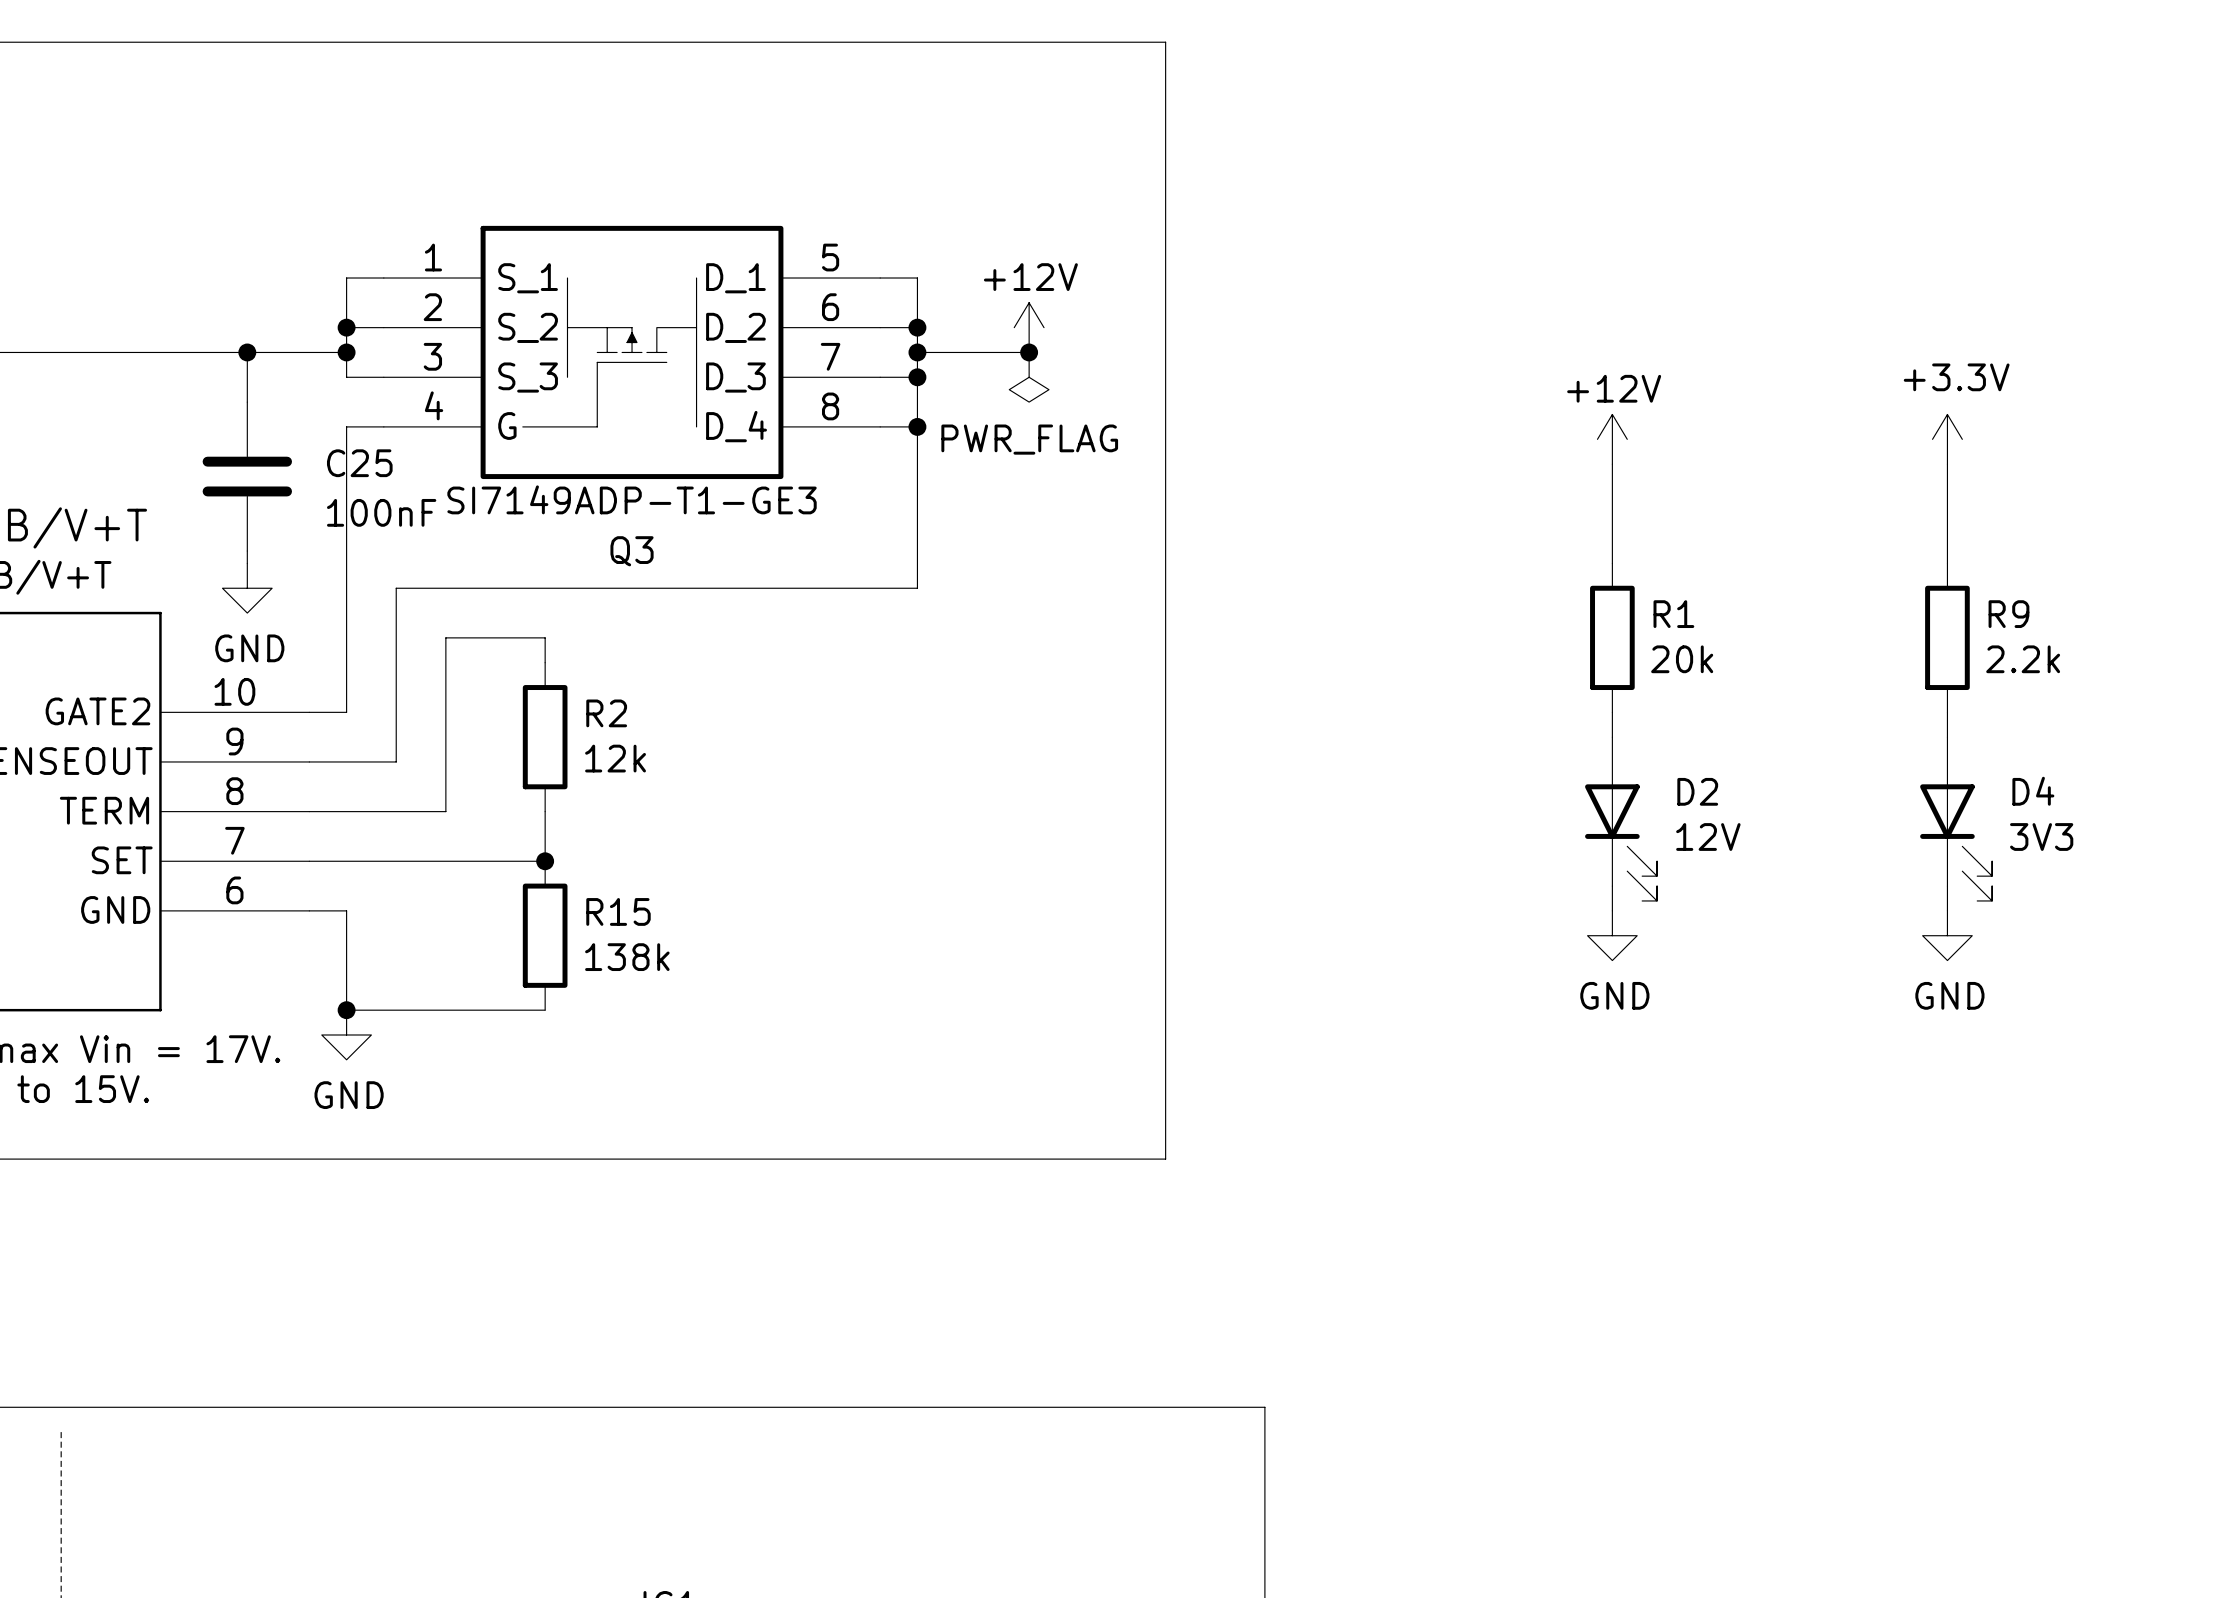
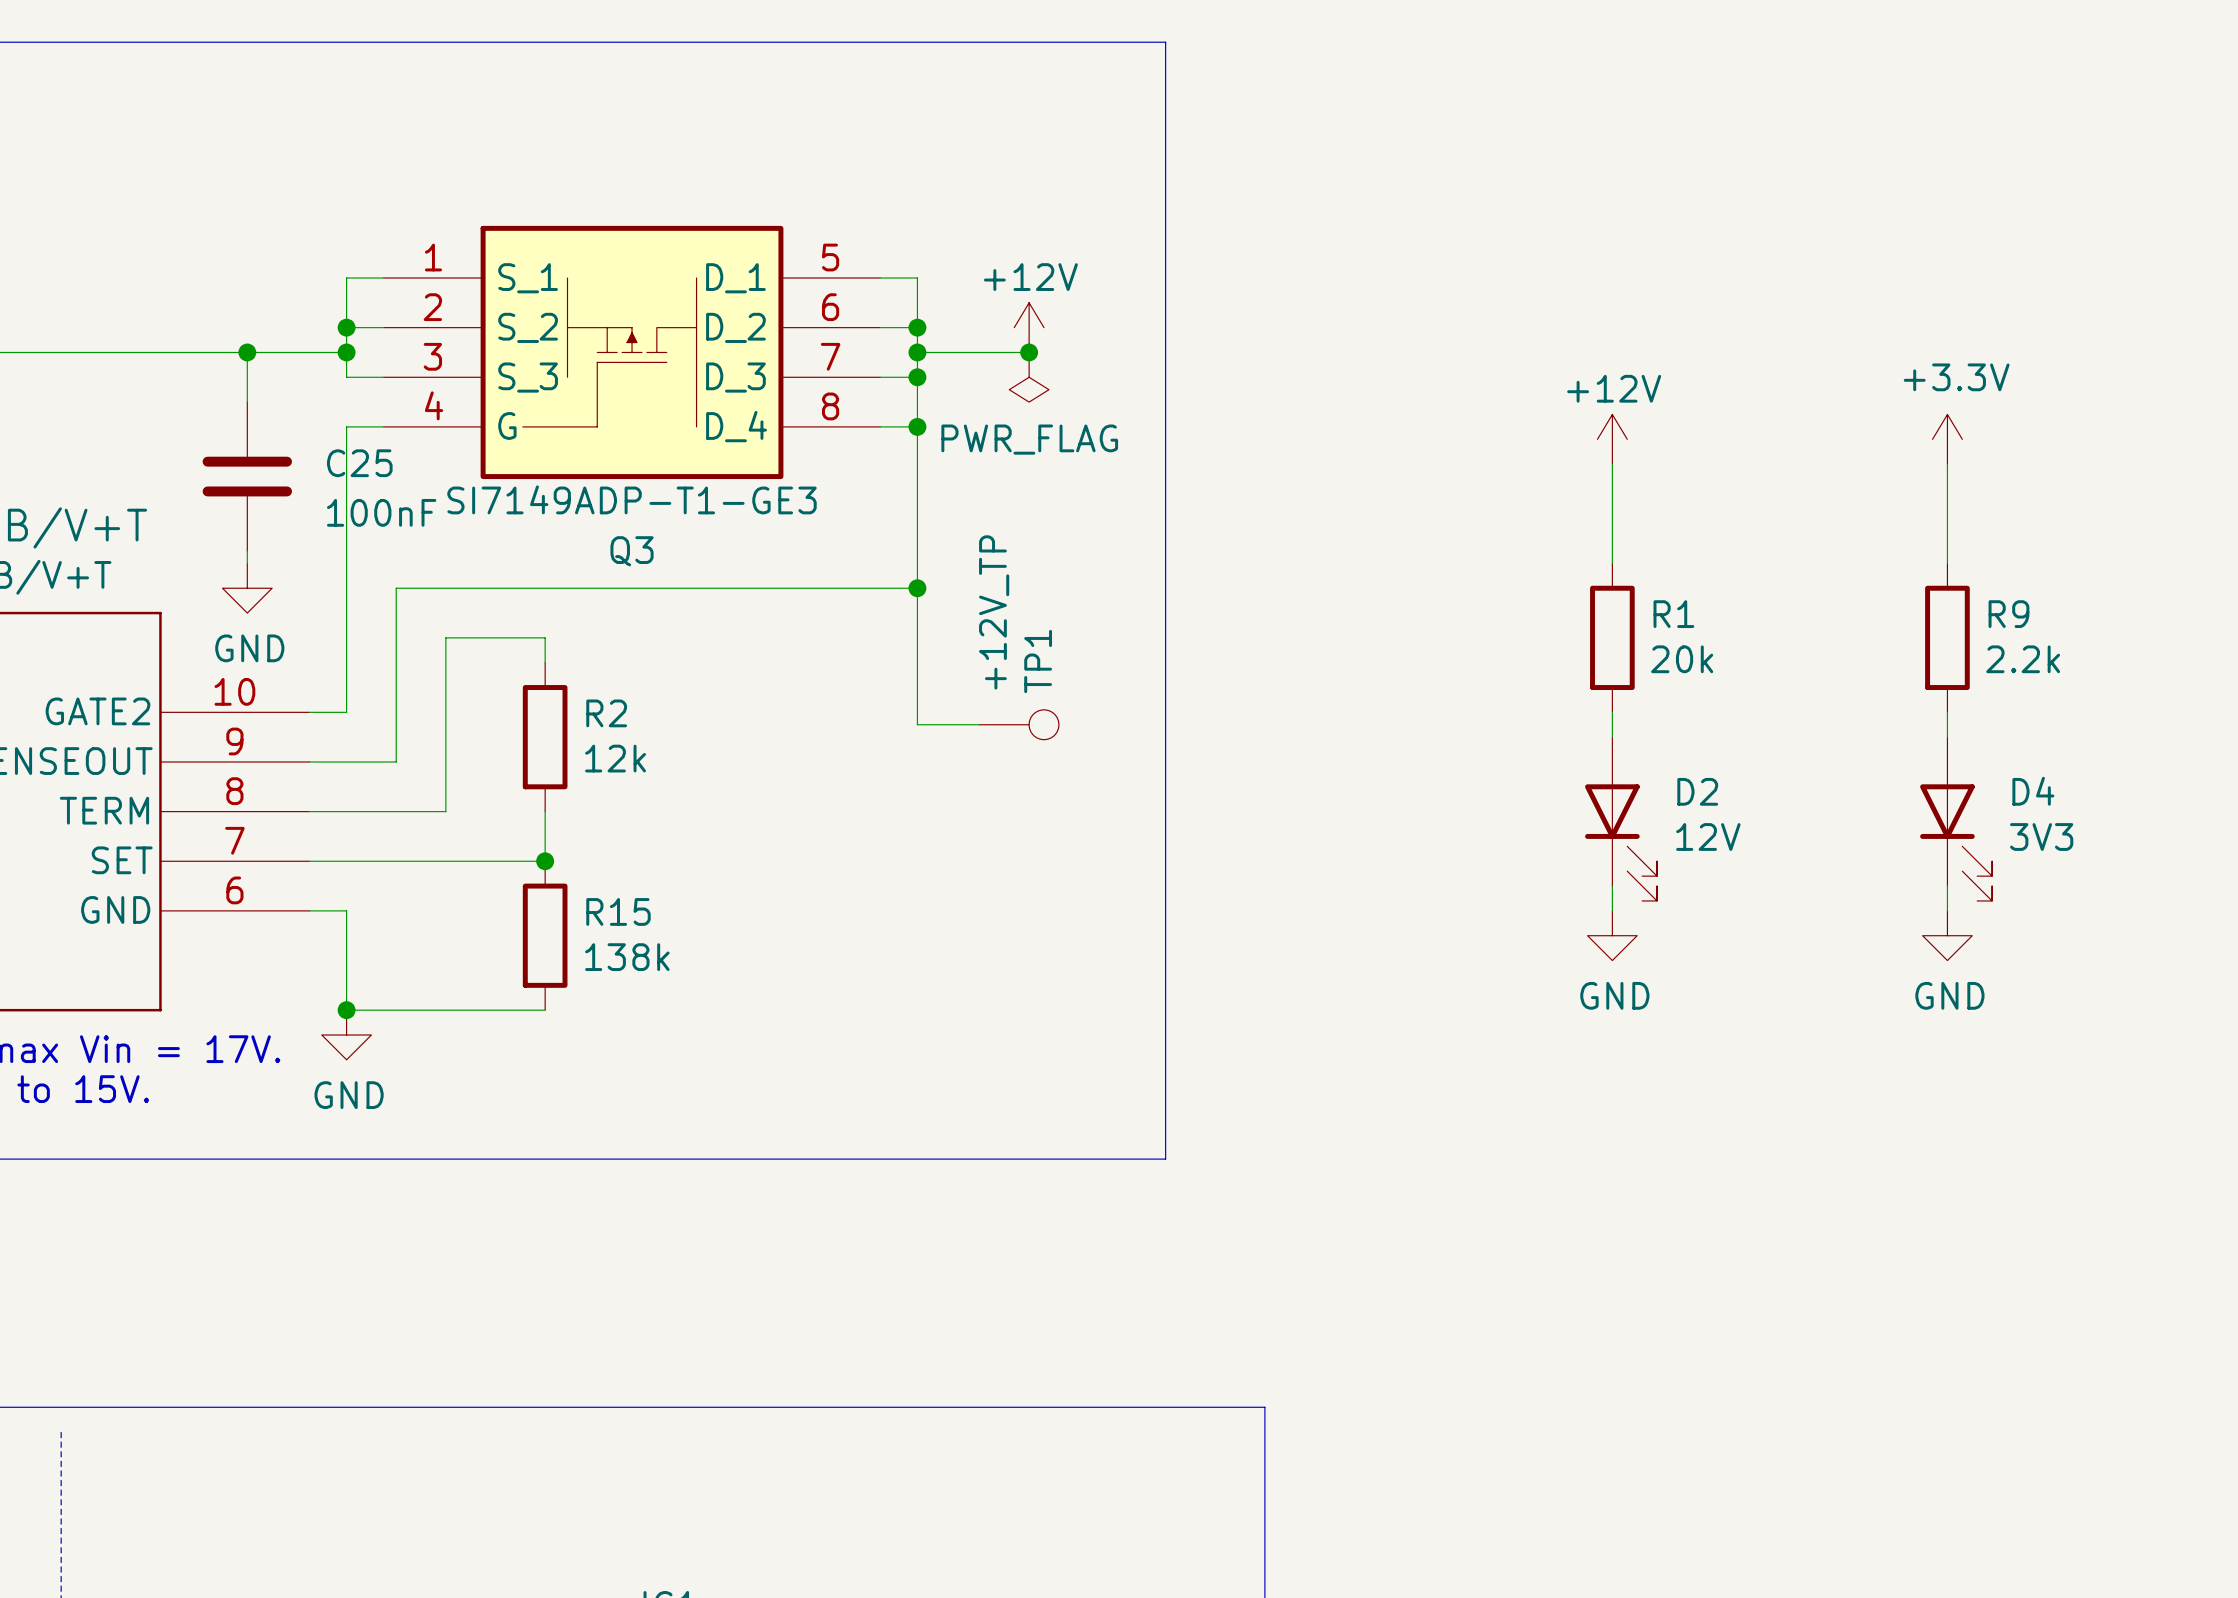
wire: none -> (917, 588) (917, 724) (979, 724)
junction: none -> (917, 588)
TP1: none -> +12V_TP (1019, 724)

